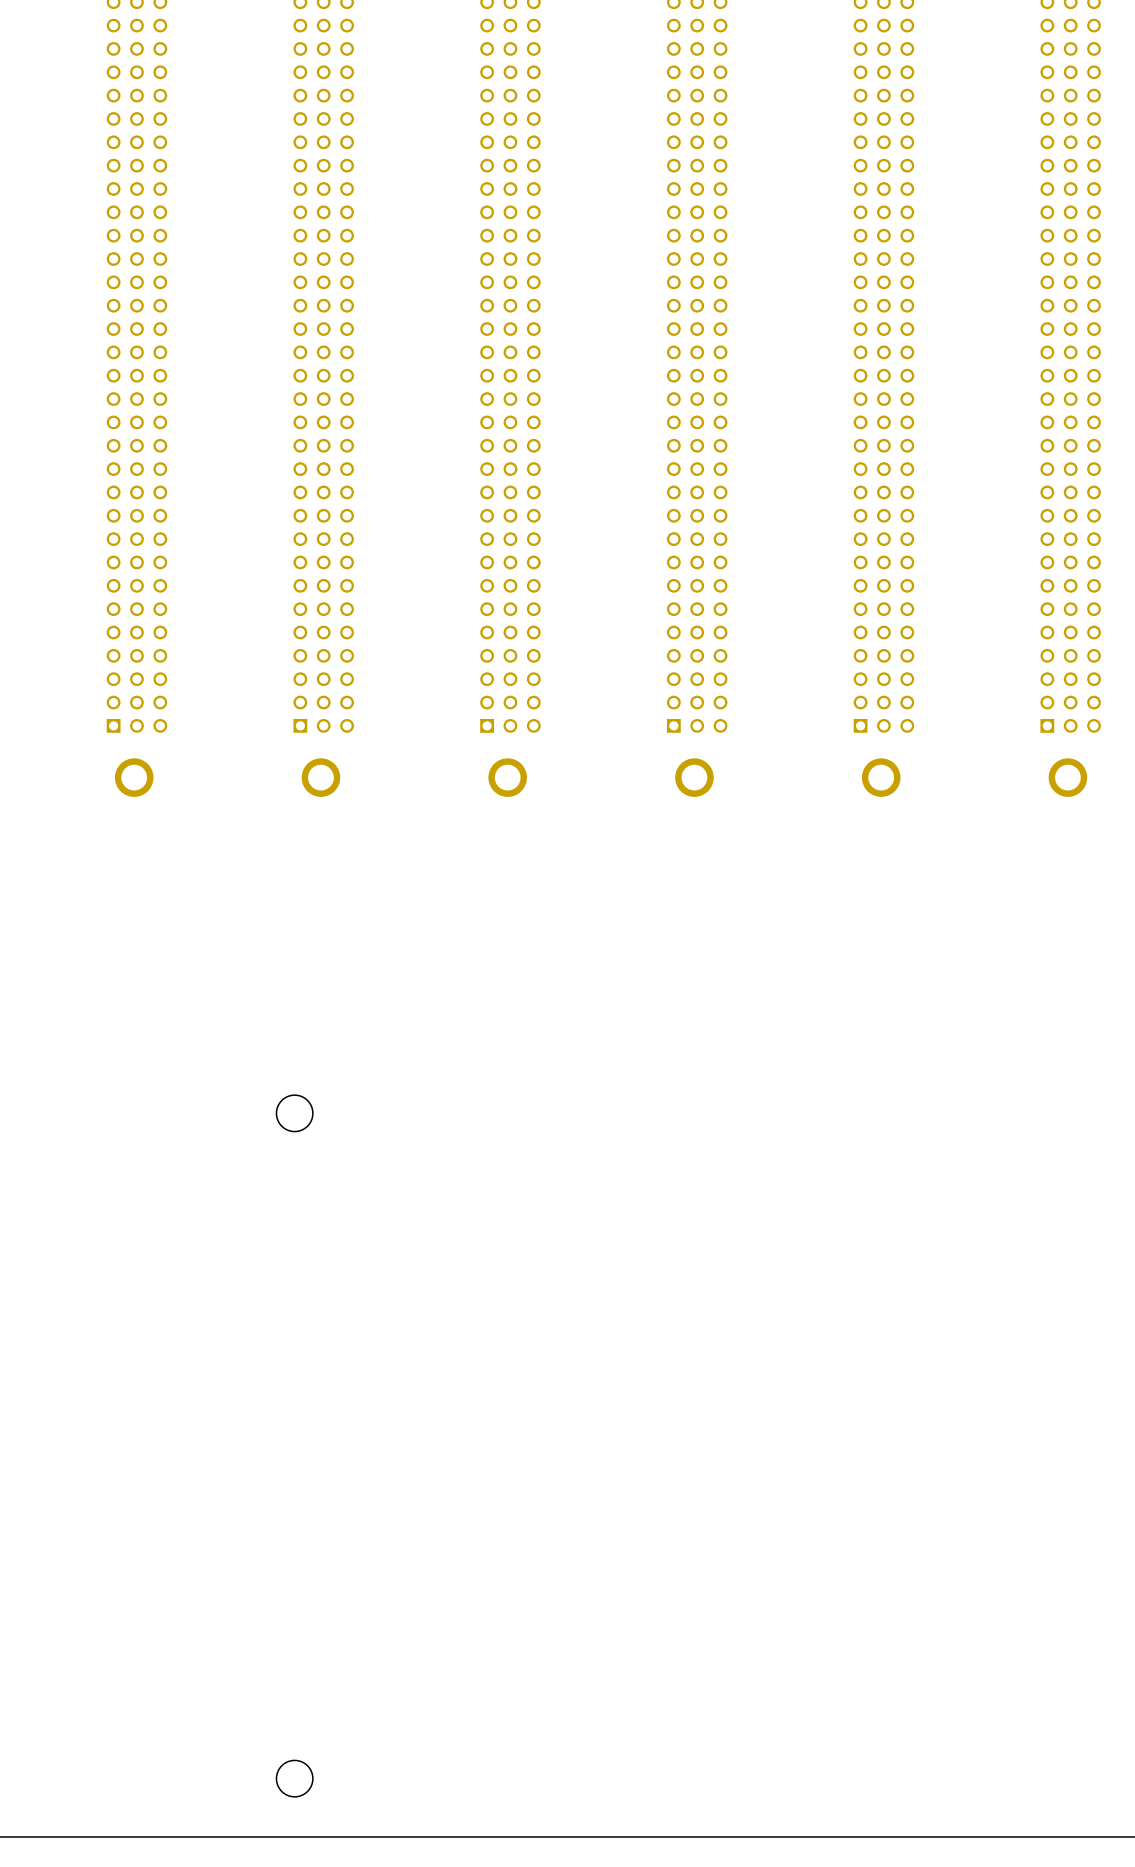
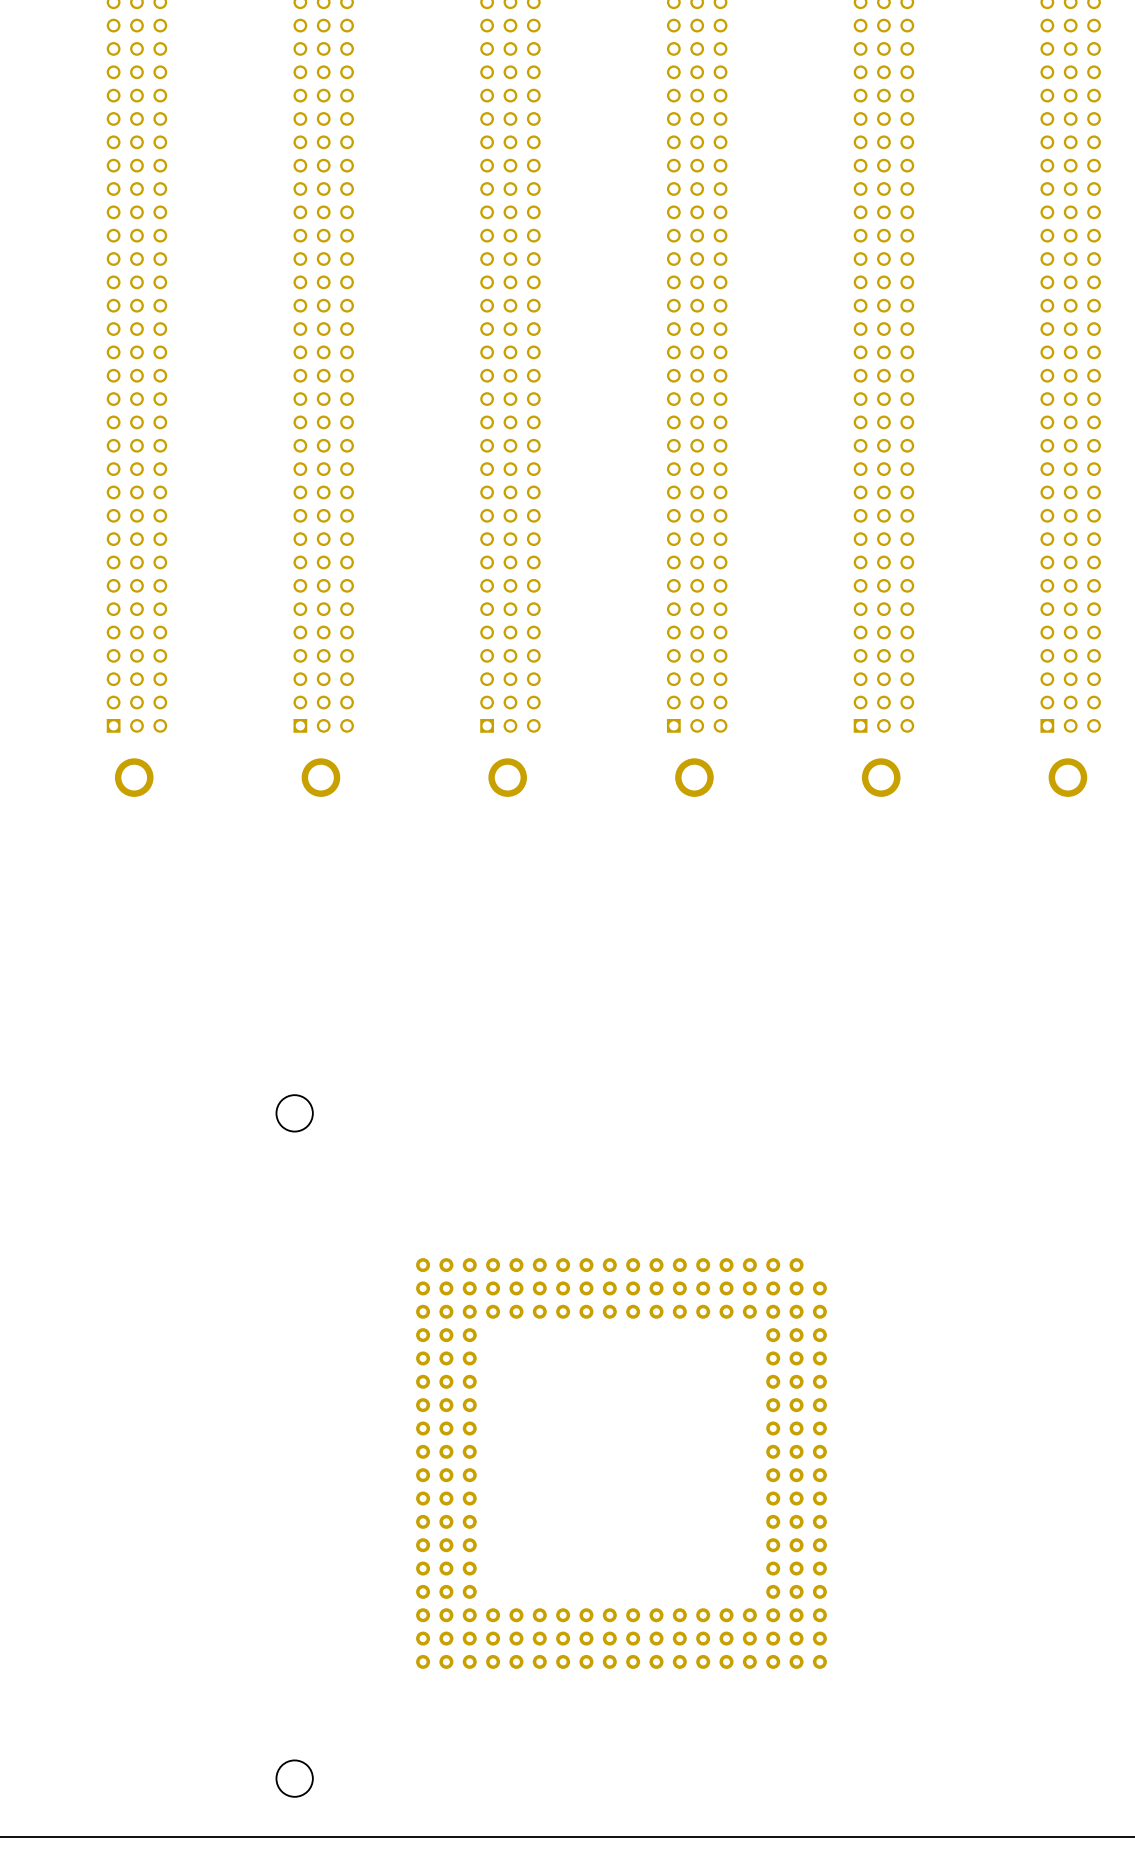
part: none -> (621, 1463)

